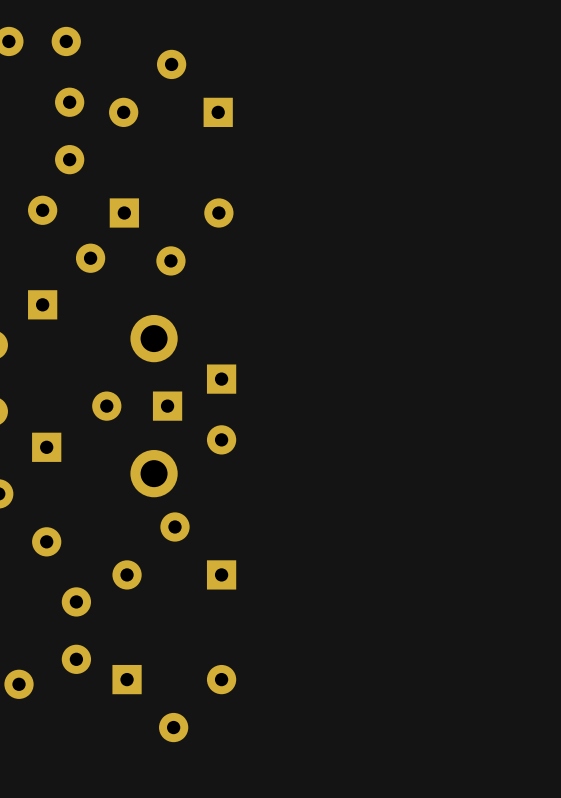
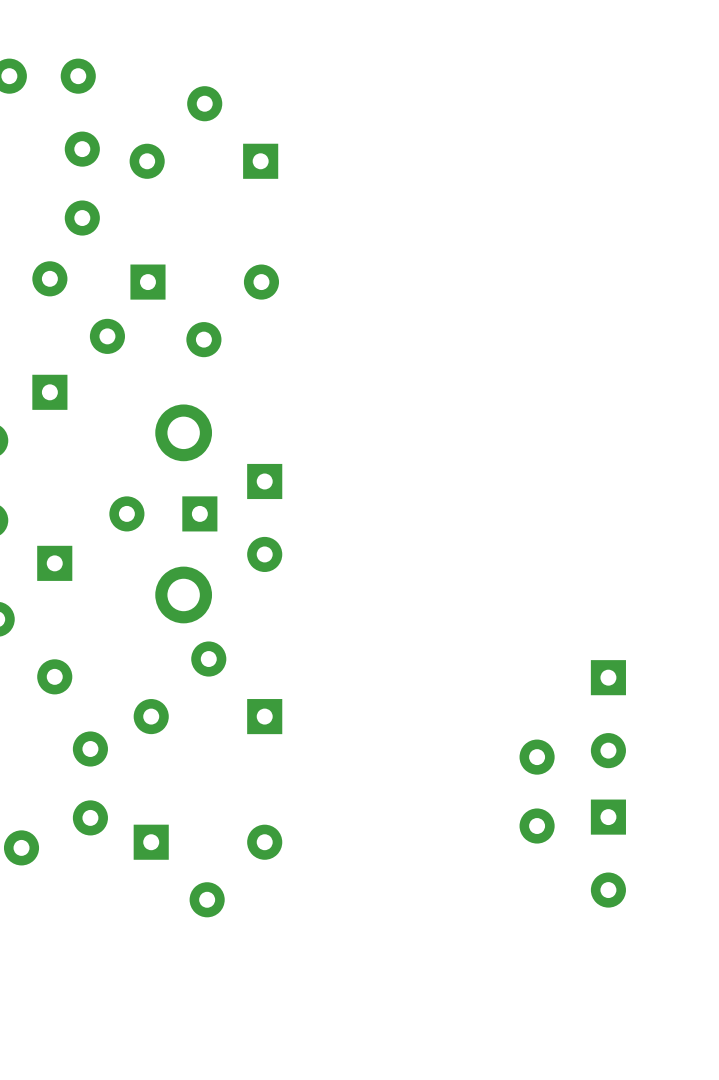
part: none -> (608, 714)
part: none -> (537, 791)
part: none -> (608, 853)

